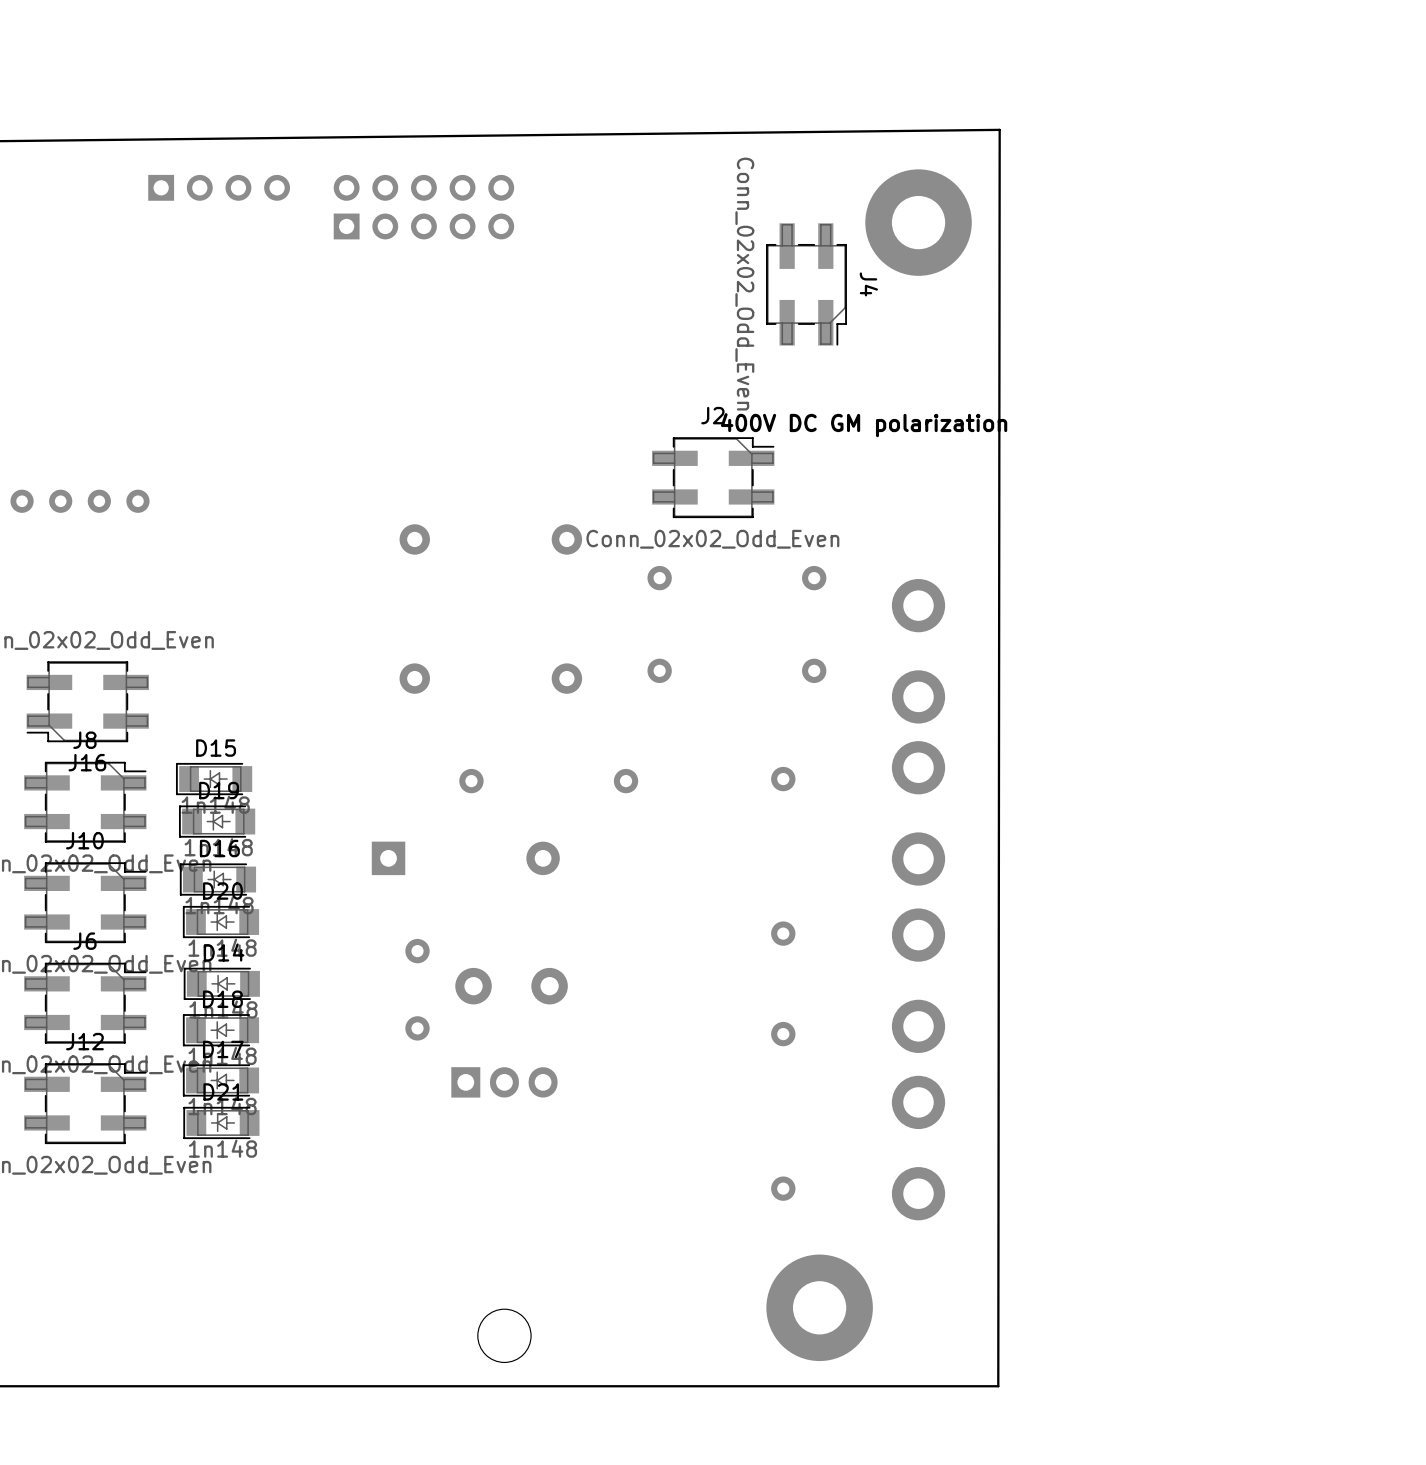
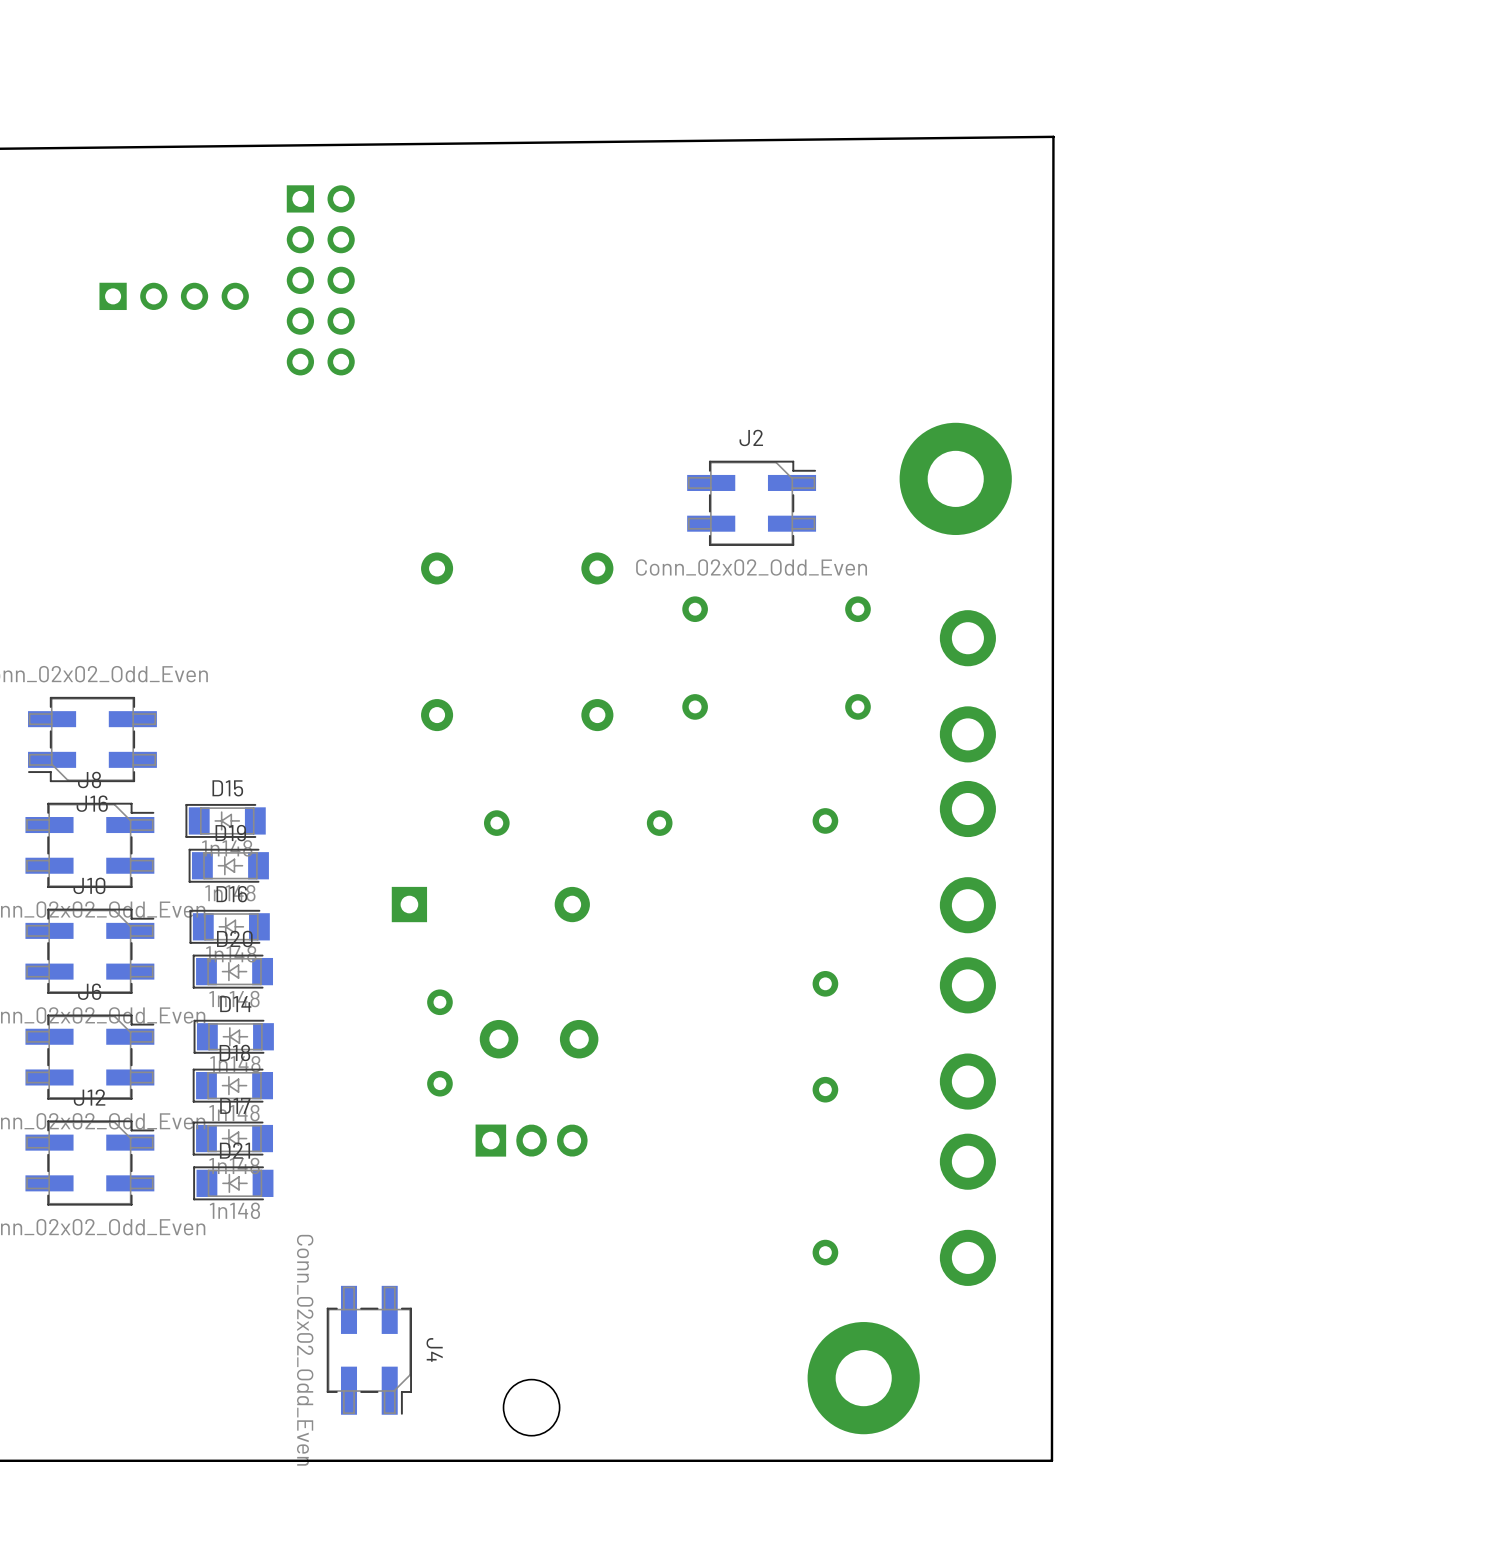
part position: (219, 187) -> (174, 296)
part rotation: 0° (423, 207) -> 90° clockwise (320, 280)
part position: (423, 207) -> (320, 280)
part position: (918, 222) -> (955, 478)
J4 position: (806, 284) -> (369, 1350)
text: 400V DC GM polarization (864, 425) -> none
part: (80, 501) -> none

